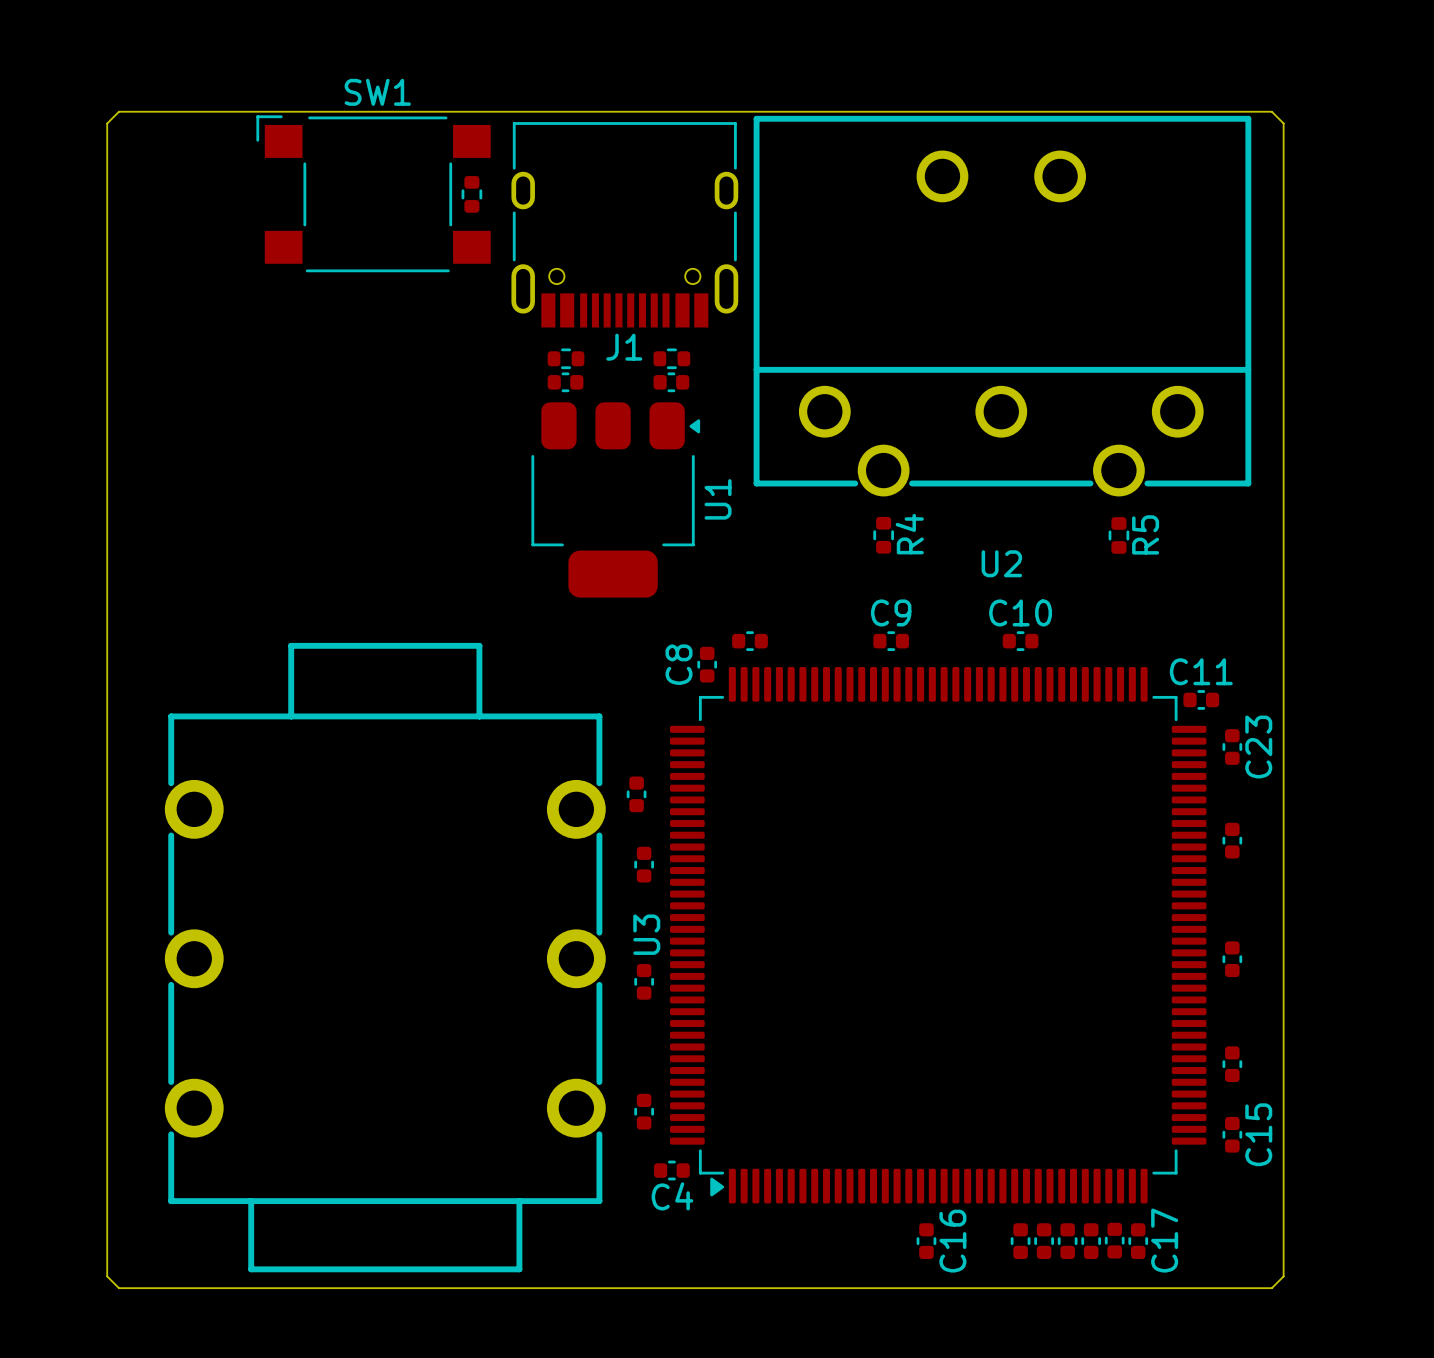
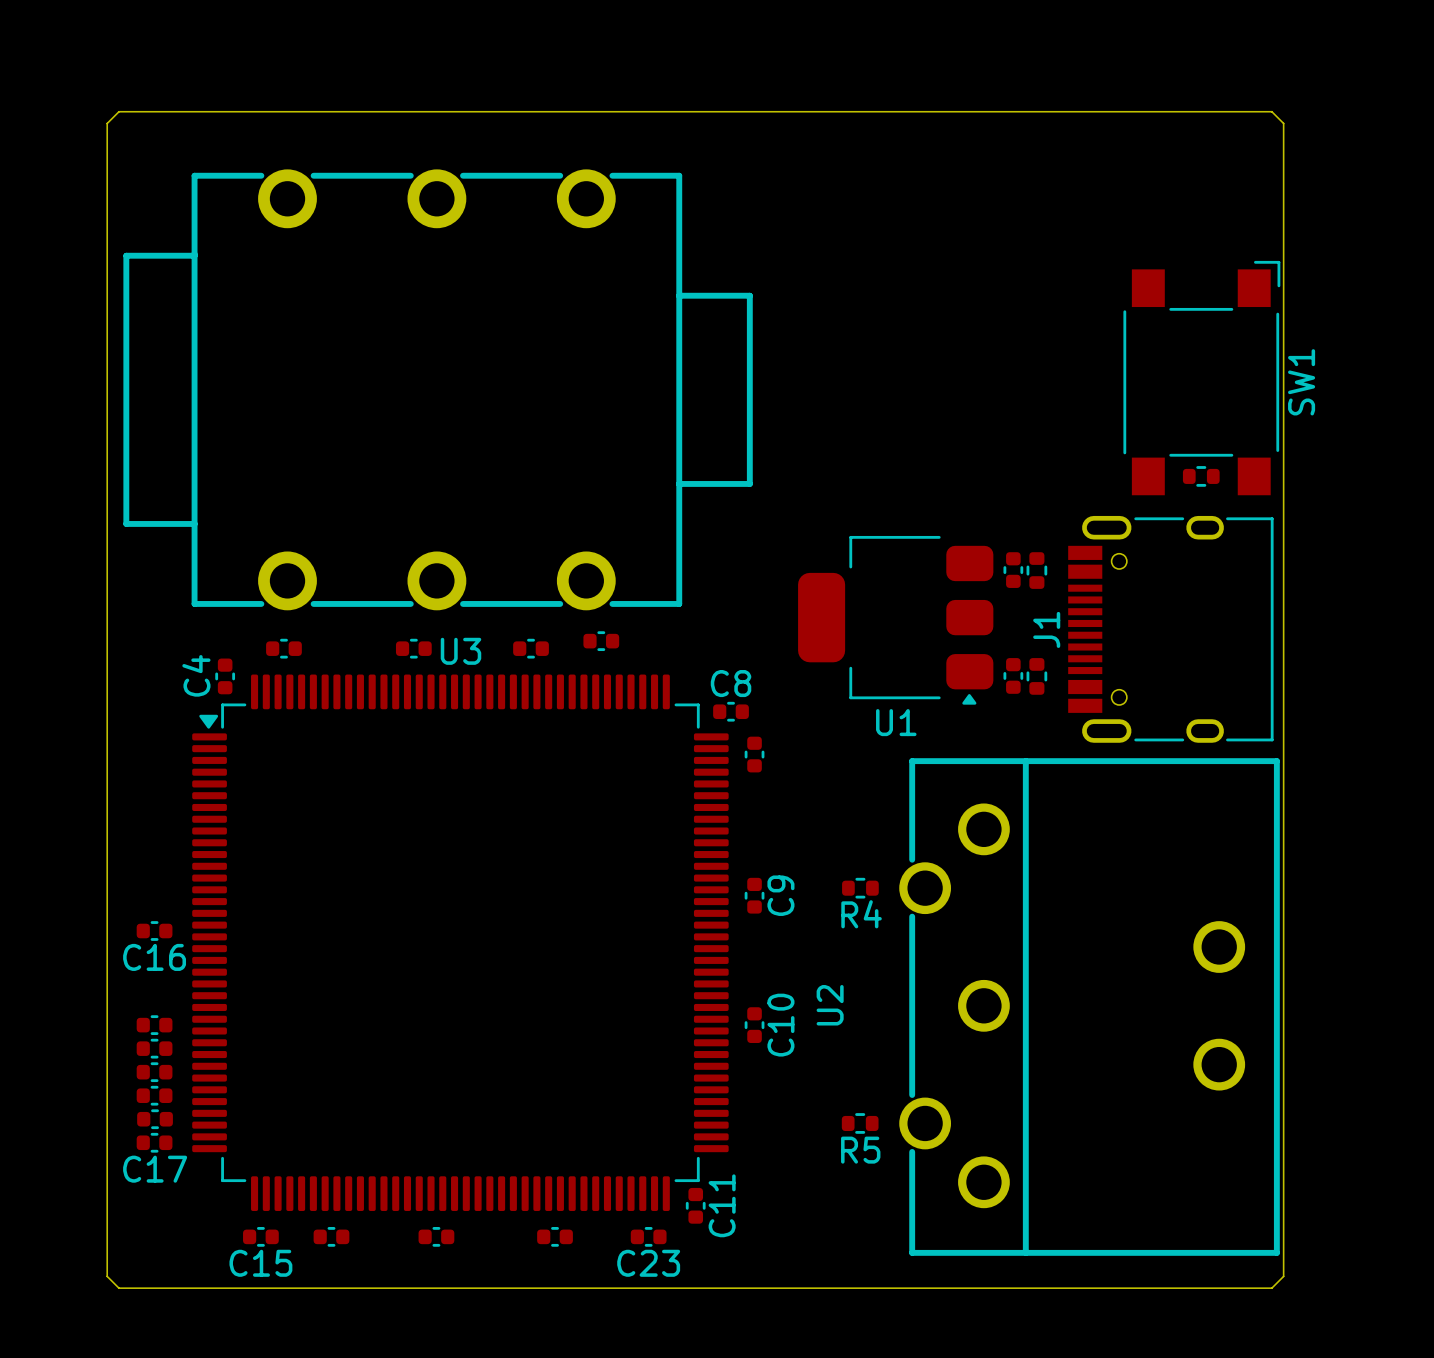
SW1 rotation: 0° (373, 193) -> 90° clockwise (1201, 378)
SW1 position: (373, 193) -> (1201, 378)
part: (471, 194) -> none
J1 rotation: 0° (624, 224) -> 90° clockwise (1170, 629)
J1 position: (624, 224) -> (1170, 629)
U2 rotation: 0° (1002, 306) -> 90° clockwise (1089, 1007)
U2 position: (1002, 306) -> (1089, 1007)
part: (566, 358) -> none
part: (671, 358) -> none
part: (565, 382) -> none
part: (671, 382) -> none
part: none -> (1201, 476)
U1 rotation: 0° (615, 499) -> 90° clockwise (895, 620)
U1 position: (615, 499) -> (895, 620)
R4 rotation: 0° (883, 535) -> 90° clockwise (860, 888)
R4 position: (883, 535) -> (860, 888)
R5 rotation: 0° (1118, 535) -> 90° clockwise (860, 1123)
R5 position: (1118, 535) -> (860, 1123)
part: none -> (1013, 570)
part: none -> (1036, 570)
part: none -> (601, 641)
part: (750, 641) -> none
C9 rotation: 0° (891, 641) -> 90° clockwise (754, 895)
C9 position: (891, 641) -> (754, 895)
C10 rotation: 0° (1020, 641) -> 90° clockwise (754, 1025)
C10 position: (1020, 641) -> (754, 1025)
part: none -> (283, 648)
part: none -> (413, 648)
part: none -> (531, 648)
C8 rotation: 0° (707, 664) -> 90° clockwise (731, 711)
C8 position: (707, 664) -> (731, 711)
part: none -> (1013, 675)
part: none -> (1036, 676)
C11 rotation: 0° (1201, 699) -> 90° clockwise (695, 1205)
C11 position: (1201, 699) -> (695, 1205)
C23 rotation: 0° (1232, 747) -> 90° clockwise (648, 1236)
C23 position: (1232, 747) -> (648, 1236)
part: none -> (754, 754)
part: (636, 794) -> none
part: (1232, 840) -> none
part: (644, 864) -> none
U3 rotation: 0° (938, 935) -> 90° clockwise (460, 942)
U3 position: (938, 935) -> (460, 942)
part rotation: 0° (385, 957) -> 90° clockwise (438, 389)
part position: (385, 957) -> (438, 389)
part: (1232, 959) -> none
part: (644, 981) -> none
part: none -> (154, 1025)
part: none -> (154, 1048)
part: (1232, 1064) -> none
part: none -> (154, 1072)
part: none -> (154, 1095)
part: (644, 1111) -> none
part: none -> (155, 1119)
C15 rotation: 0° (1232, 1134) -> 90° clockwise (260, 1236)
C15 position: (1232, 1134) -> (260, 1236)
C4 rotation: 0° (671, 1170) -> 90° clockwise (225, 676)
C4 position: (671, 1170) -> (225, 676)
part: none -> (331, 1236)
part: none -> (436, 1236)
part: none -> (555, 1236)
part: (1114, 1240) -> none
C16 rotation: 0° (926, 1241) -> 90° clockwise (154, 931)
C16 position: (926, 1241) -> (154, 931)
part: (1020, 1241) -> none
part: (1044, 1241) -> none
part: (1067, 1241) -> none
part: (1091, 1241) -> none
C17 rotation: 0° (1138, 1241) -> 90° clockwise (154, 1142)
C17 position: (1138, 1241) -> (154, 1142)

